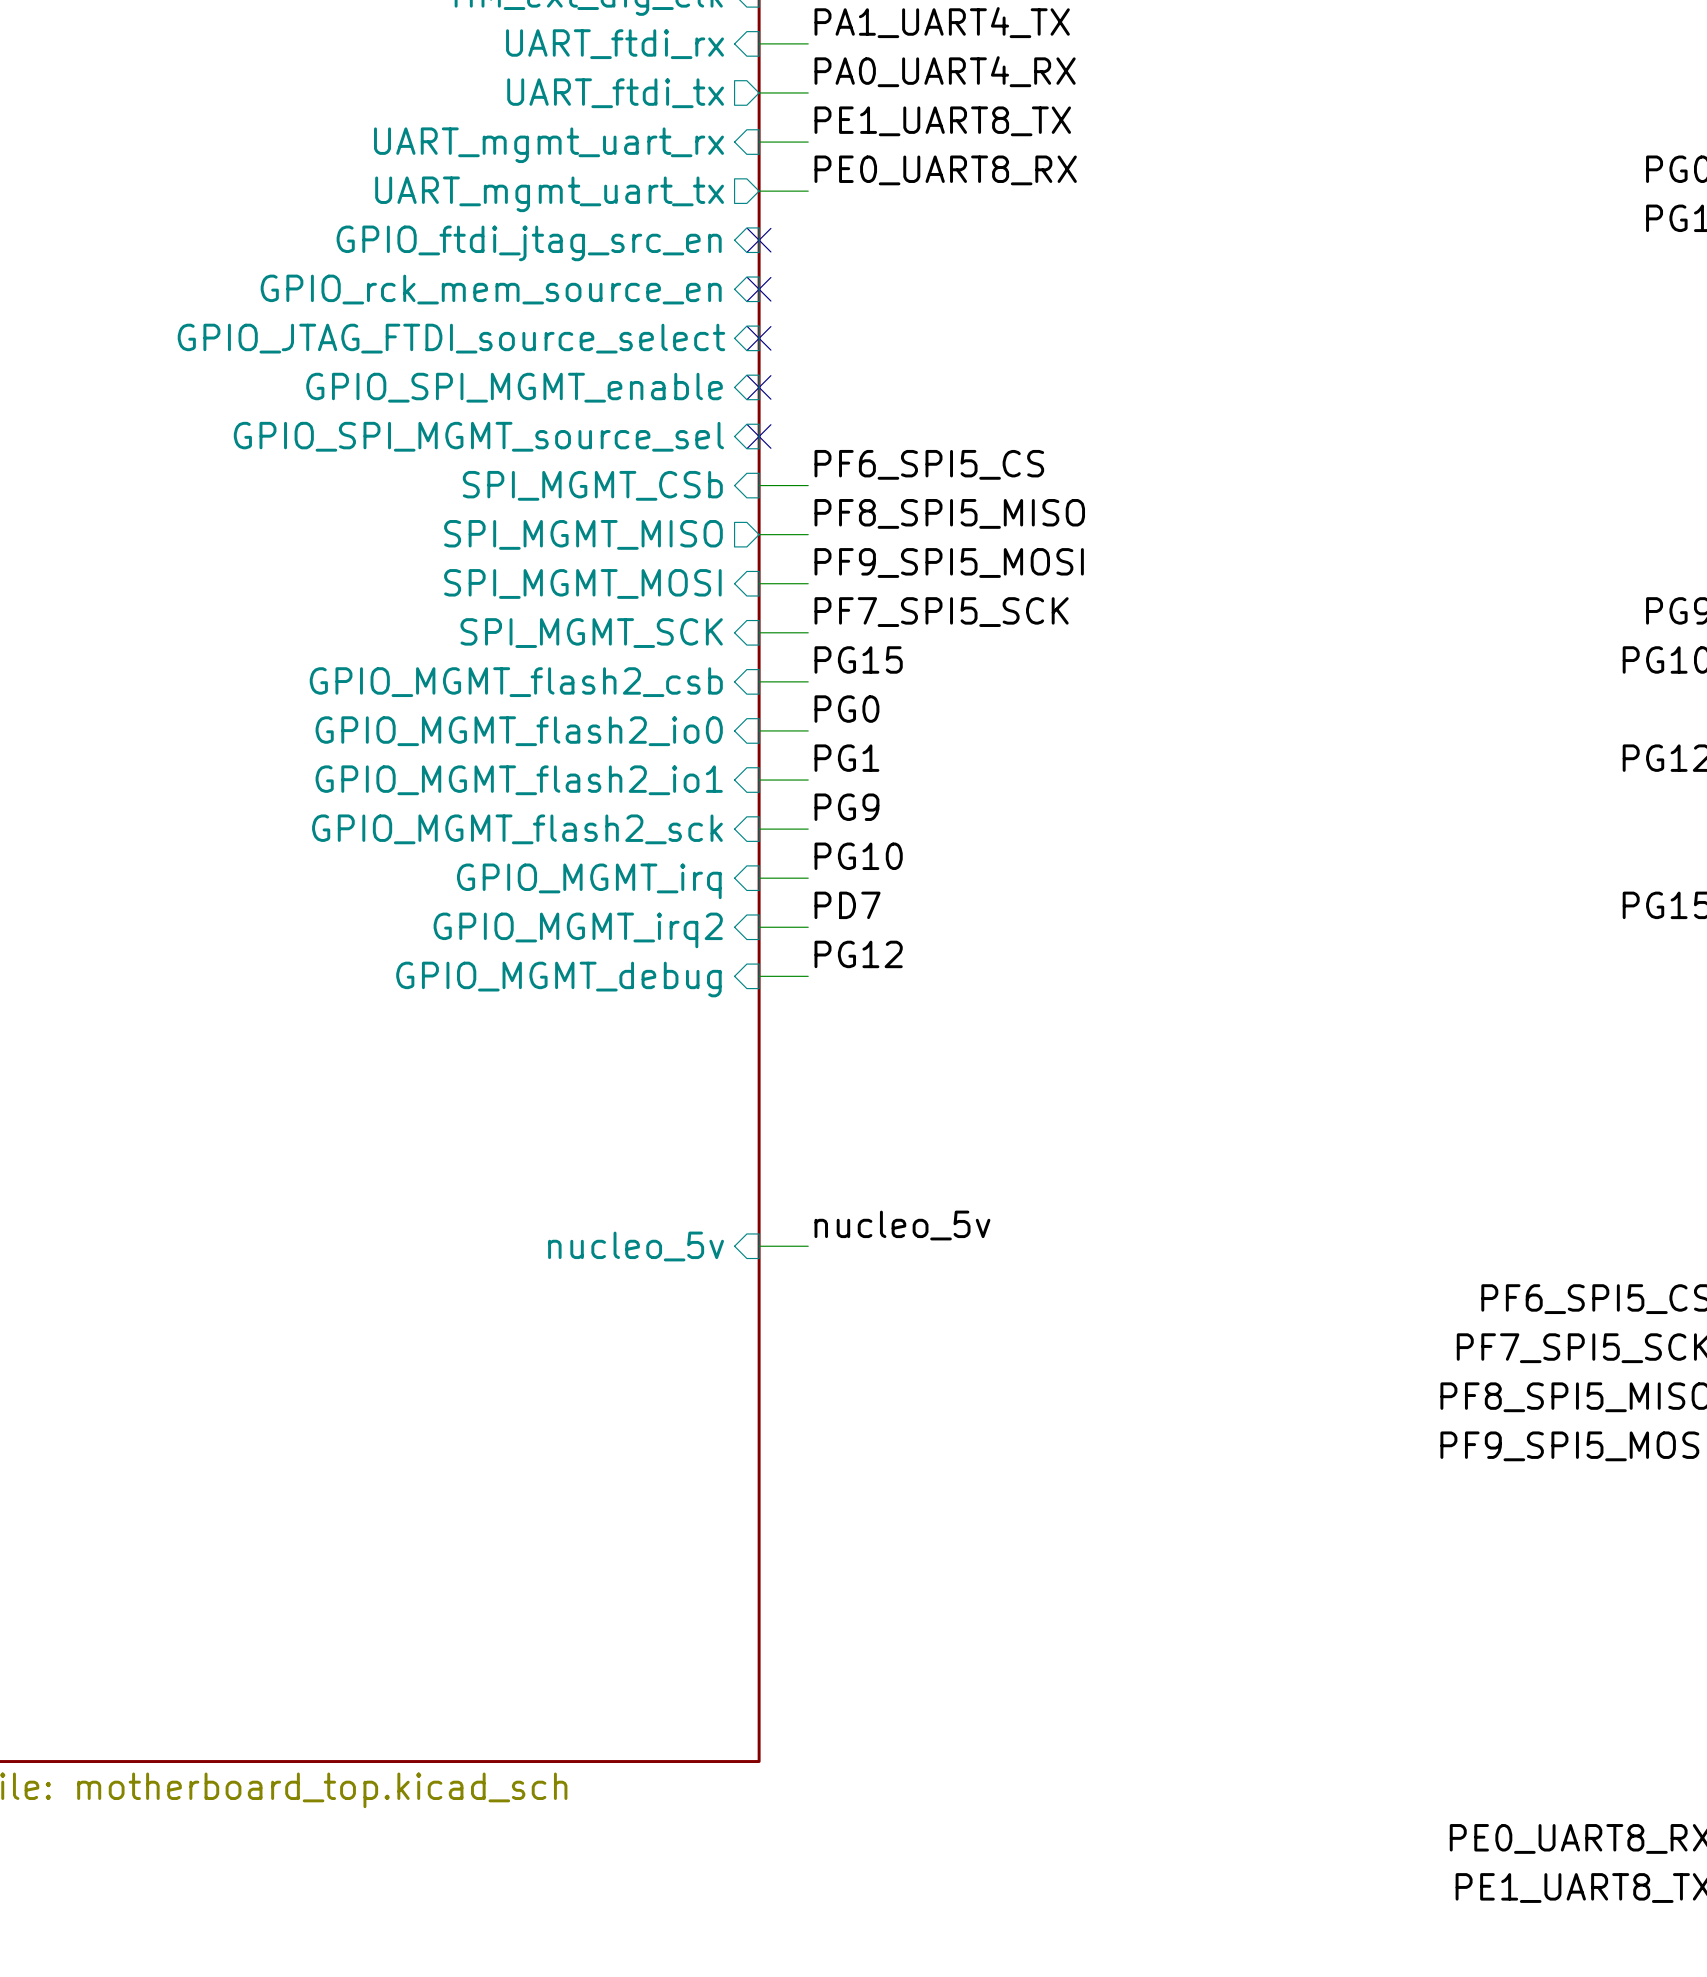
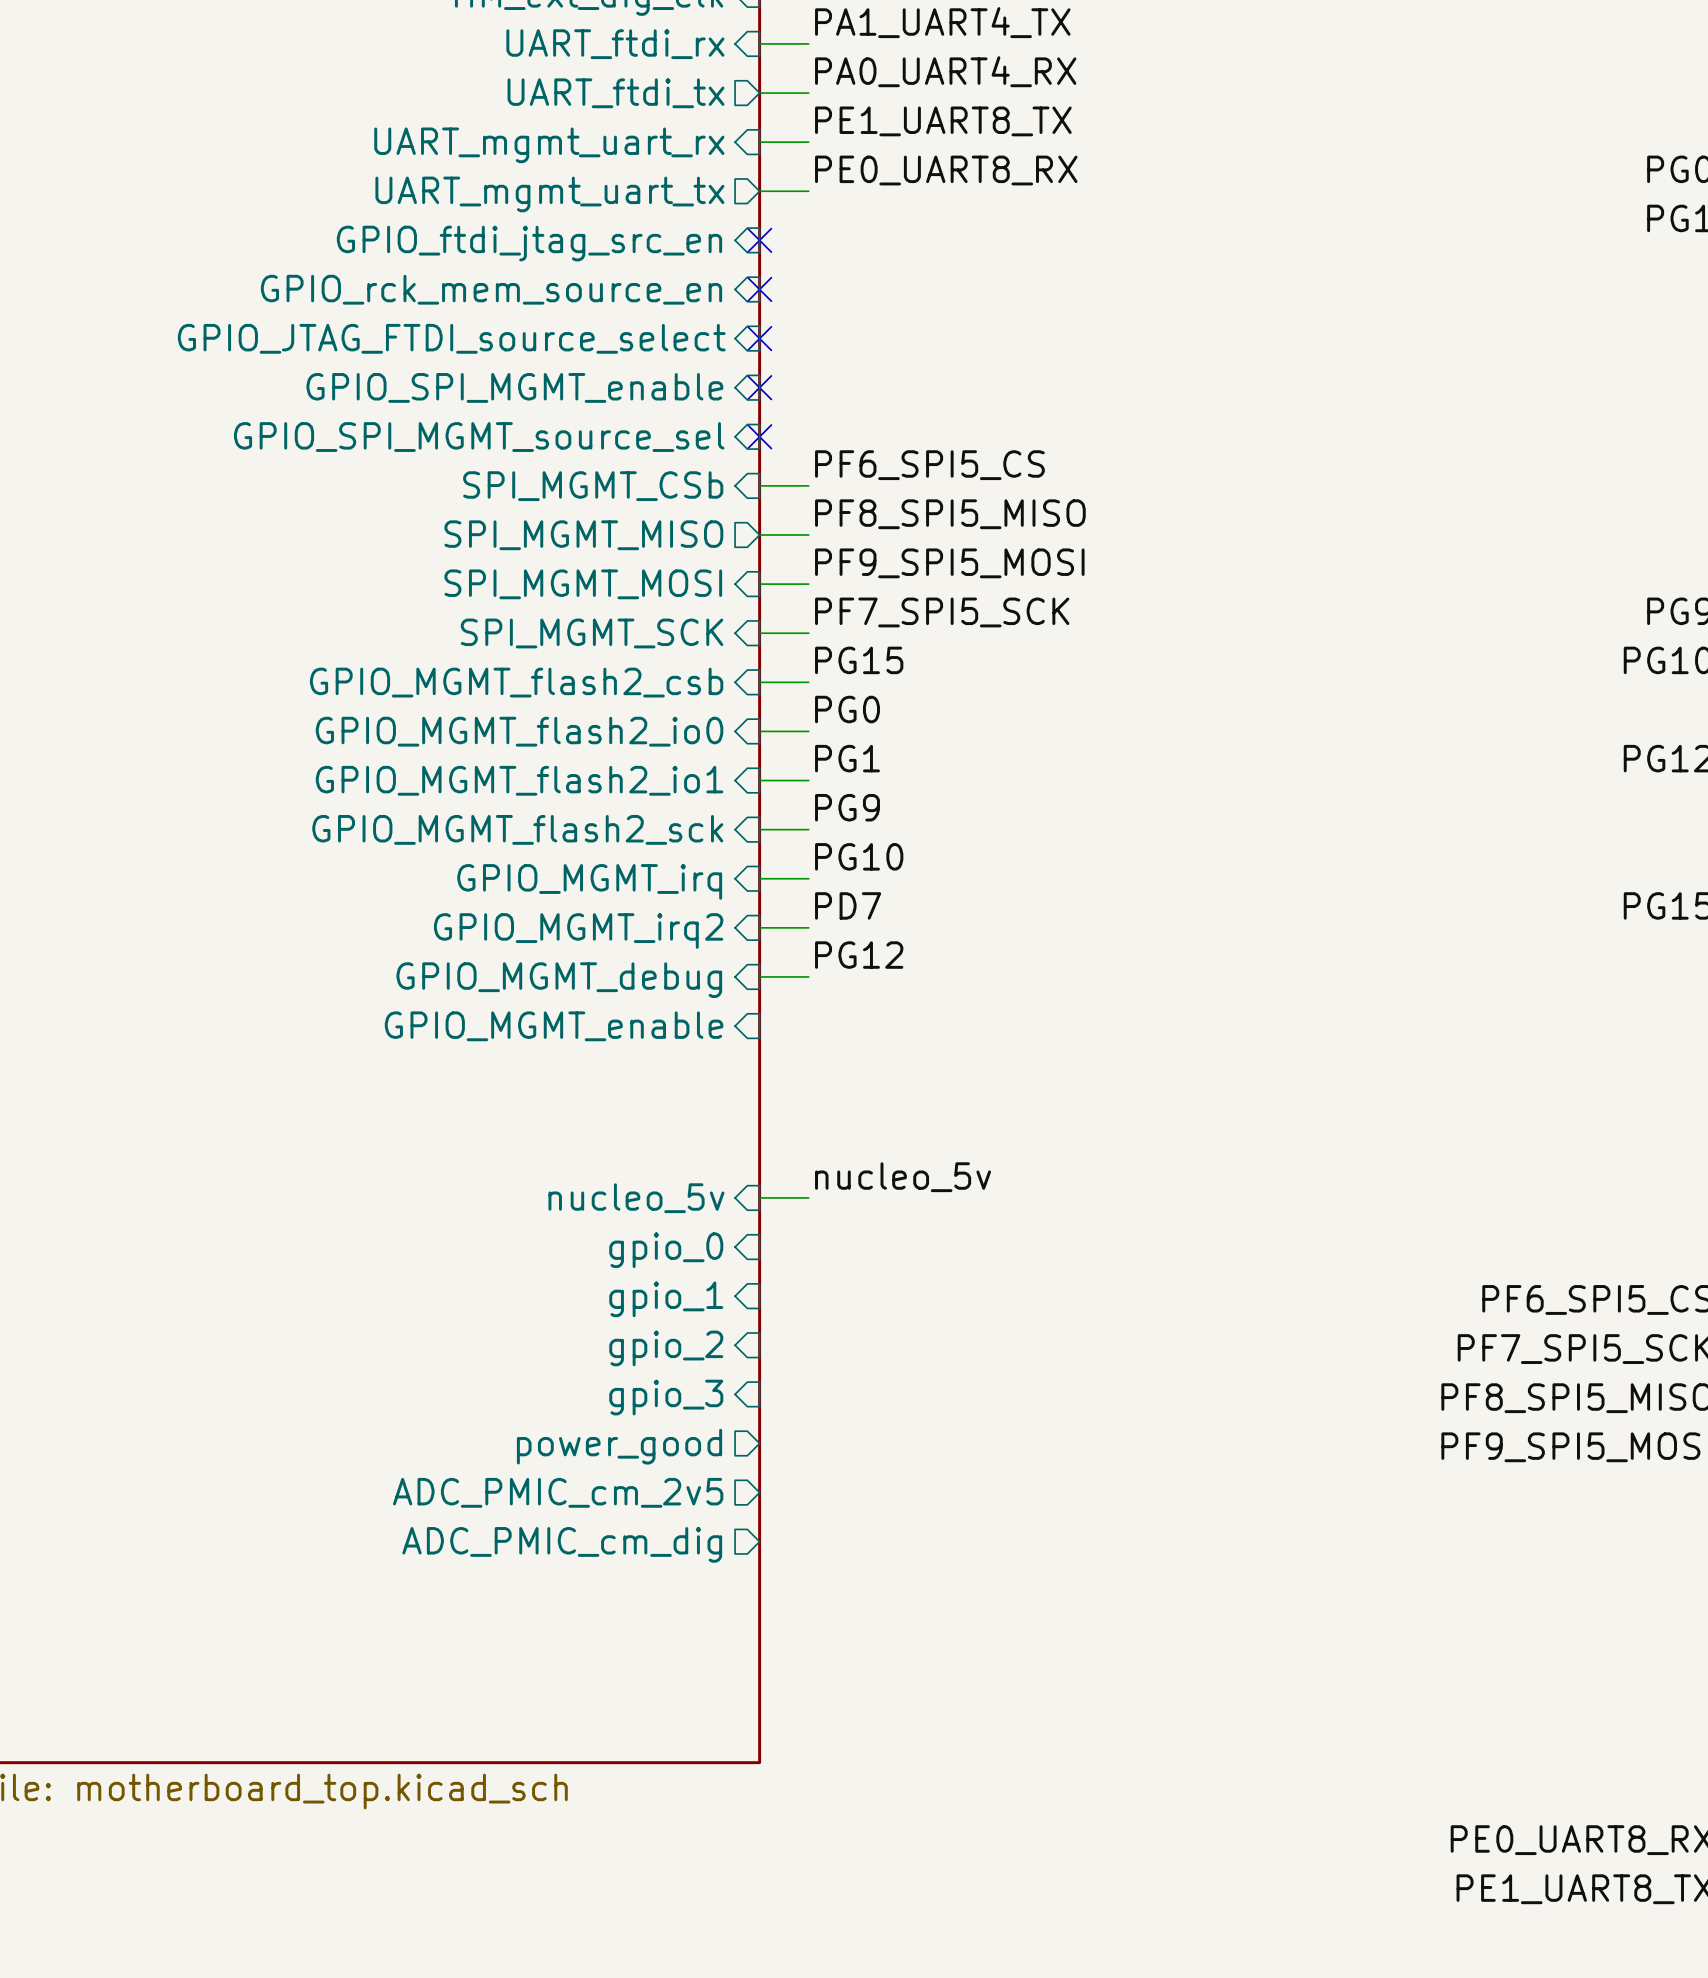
sheet pin: none -> GPIO_MGMT_enable (554, 1026)
sheet pin: none -> nucleo_5v (636, 1198)
label position: nucleo_5v (902, 1225) -> nucleo_5v (903, 1177)
sheet pin: nucleo_5v (636, 1246) -> gpio_0 (666, 1250)
wire: (759, 1246) (808, 1246) -> (759, 1197) (808, 1197)
sheet pin: none -> gpio_1 (666, 1299)
sheet pin: none -> gpio_2 (666, 1348)
sheet pin: none -> gpio_3 (666, 1397)
sheet pin: none -> power_good (619, 1446)
sheet pin: none -> ADC_PMIC_cm_2v5 (558, 1492)
sheet pin: none -> ADC_PMIC_cm_dig (562, 1544)

